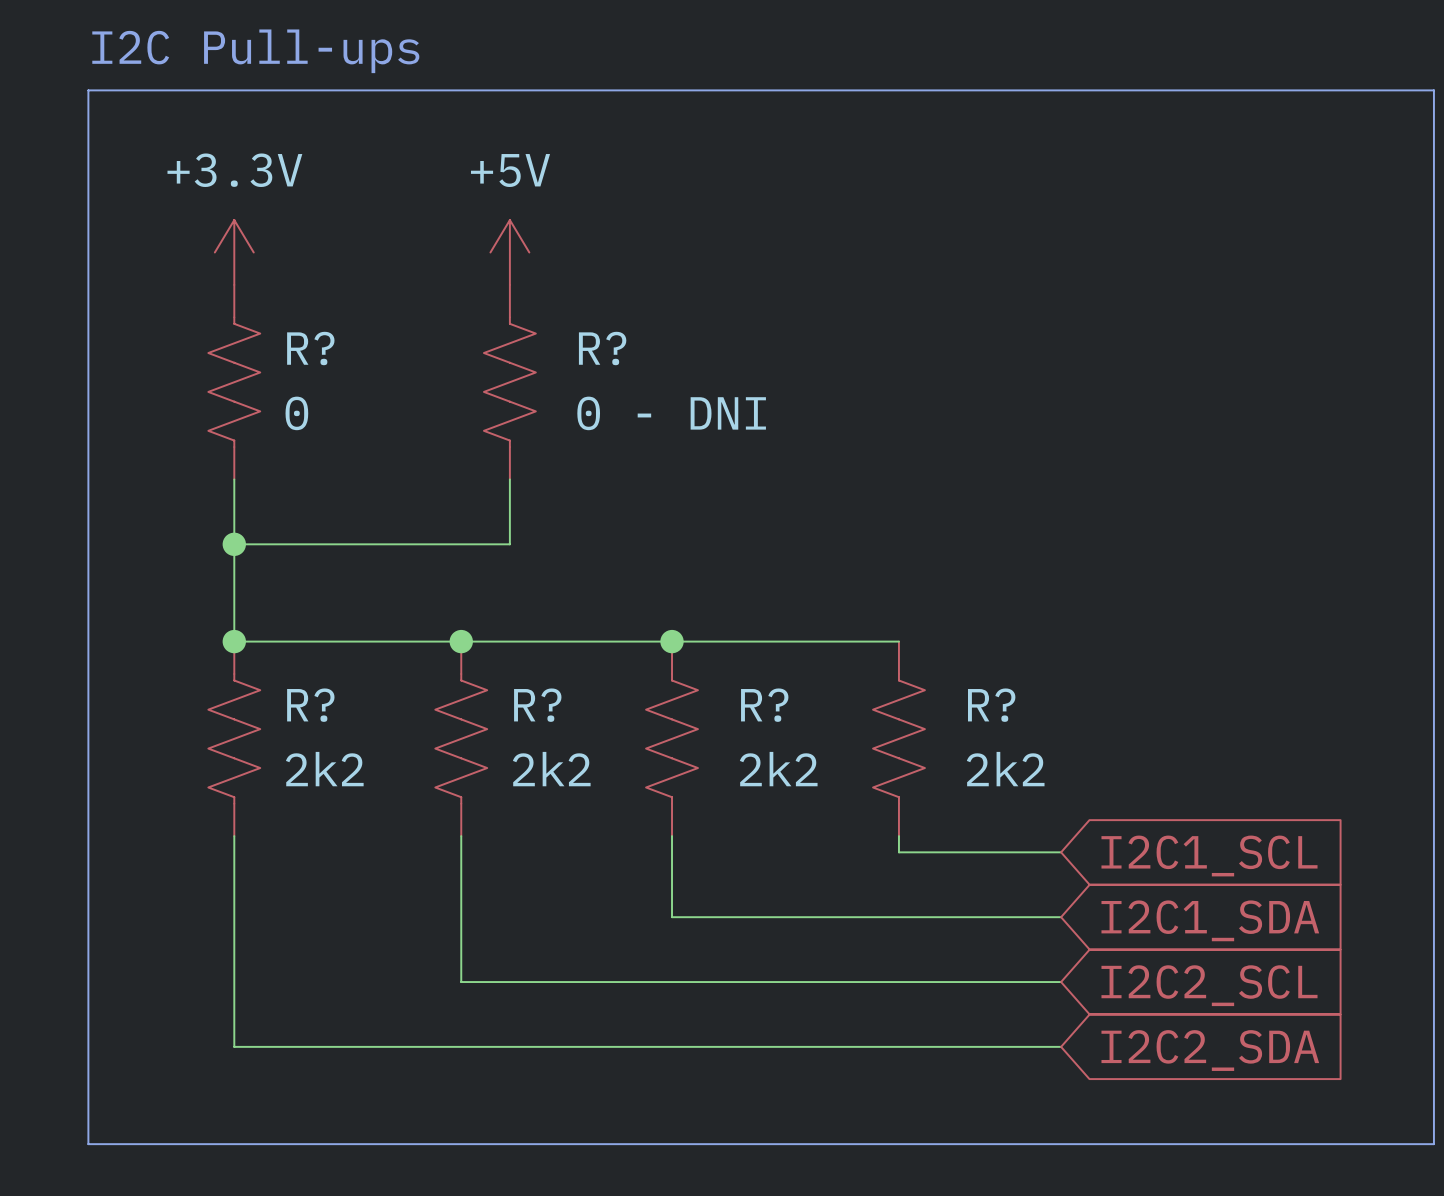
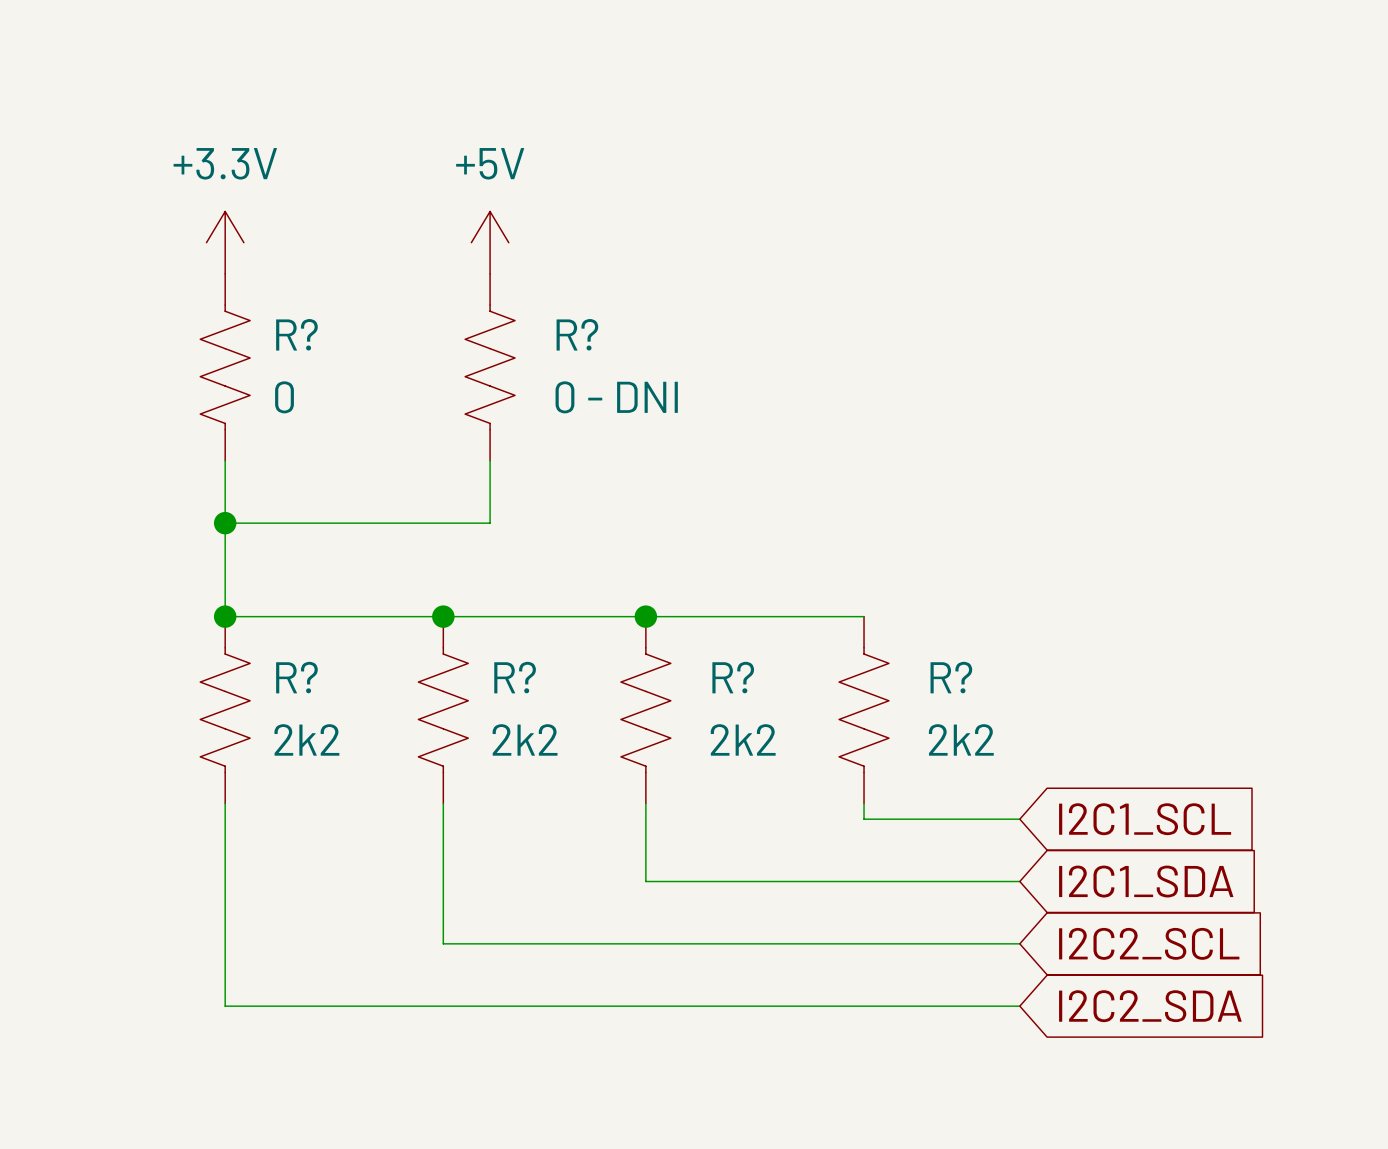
text: I2C Pull-ups (255, 51) -> none
line: (88, 90) (1433, 90) (1433, 1144) (88, 1144) (88, 90) -> none

